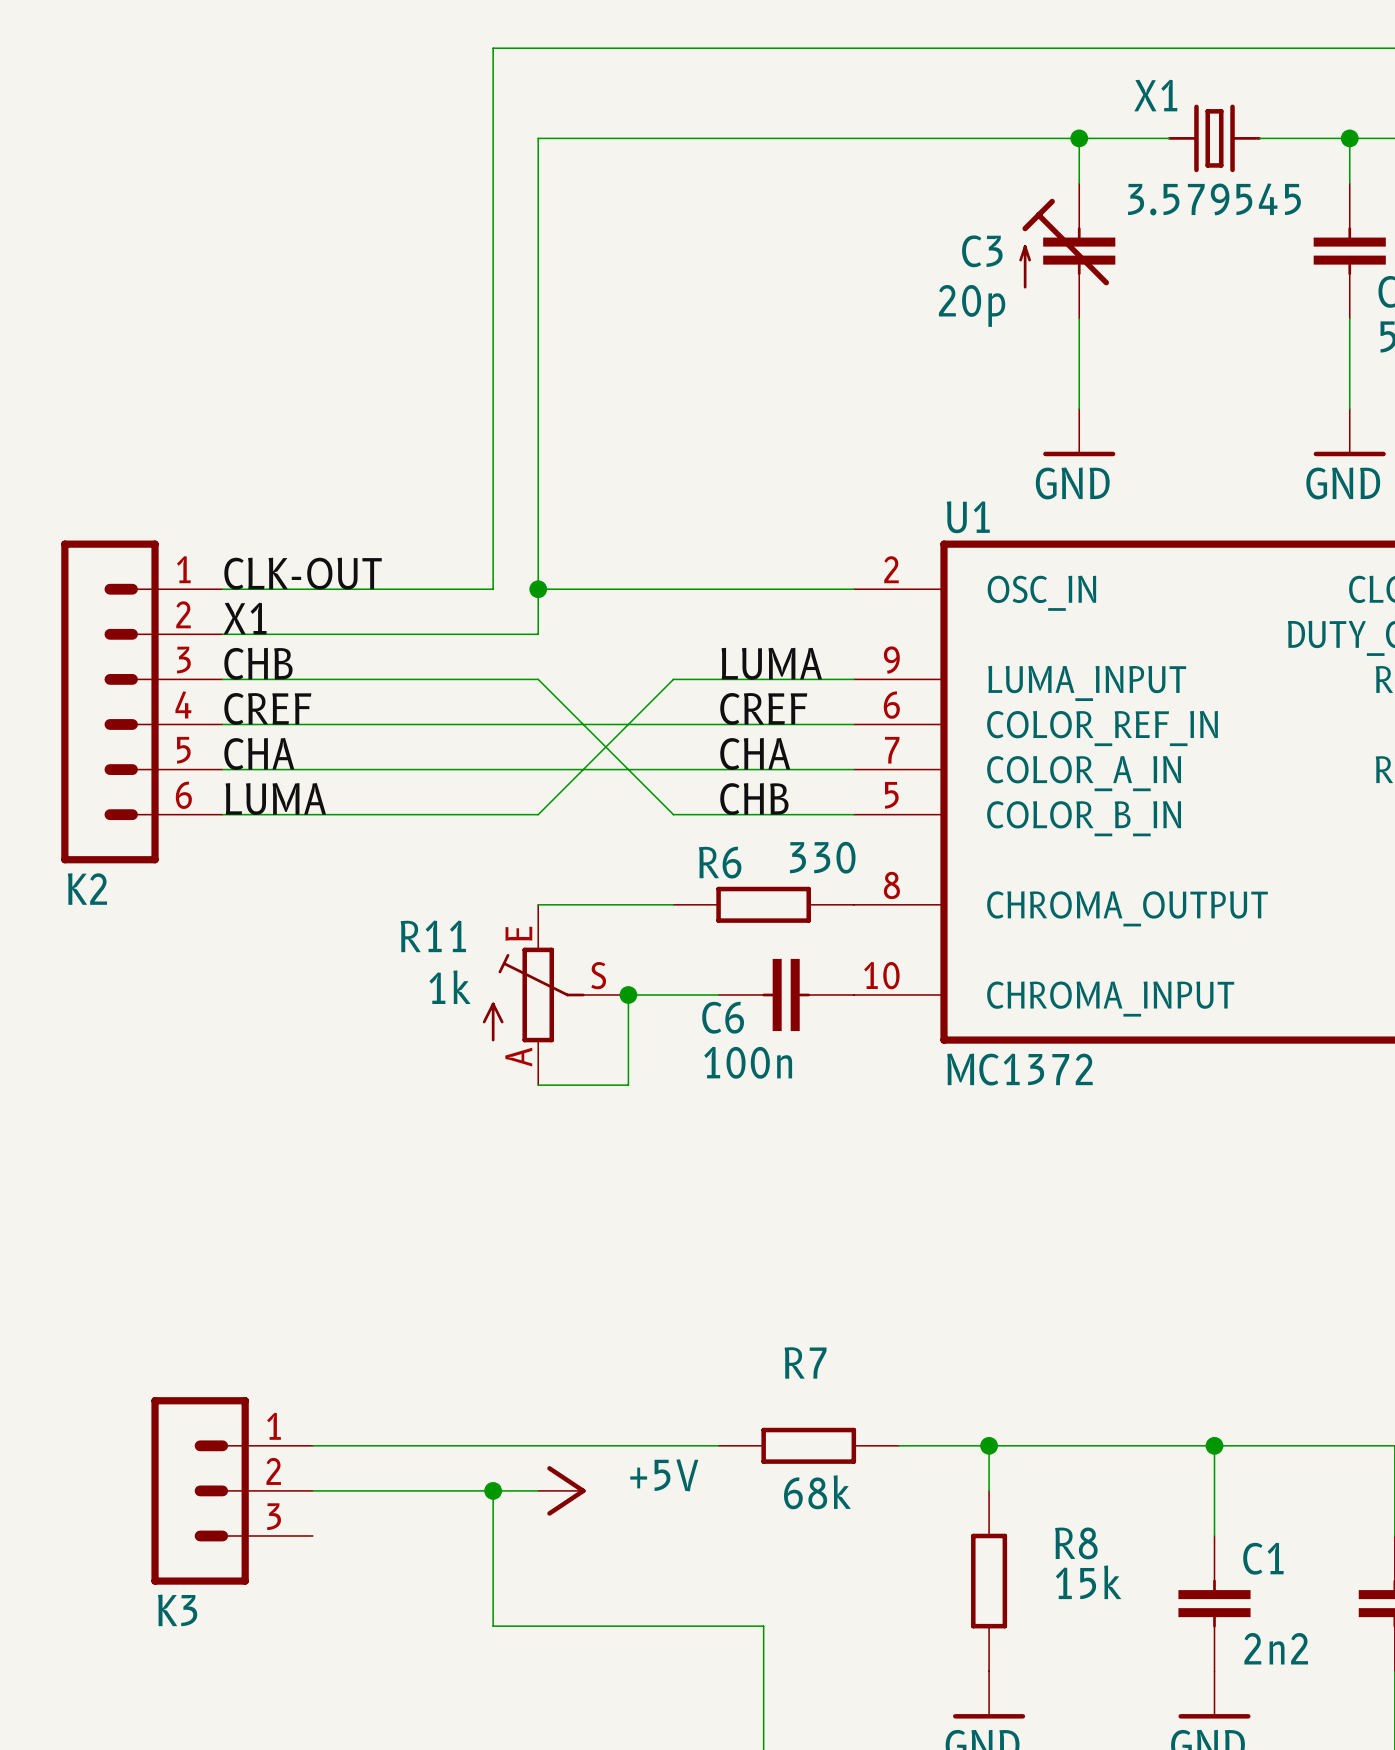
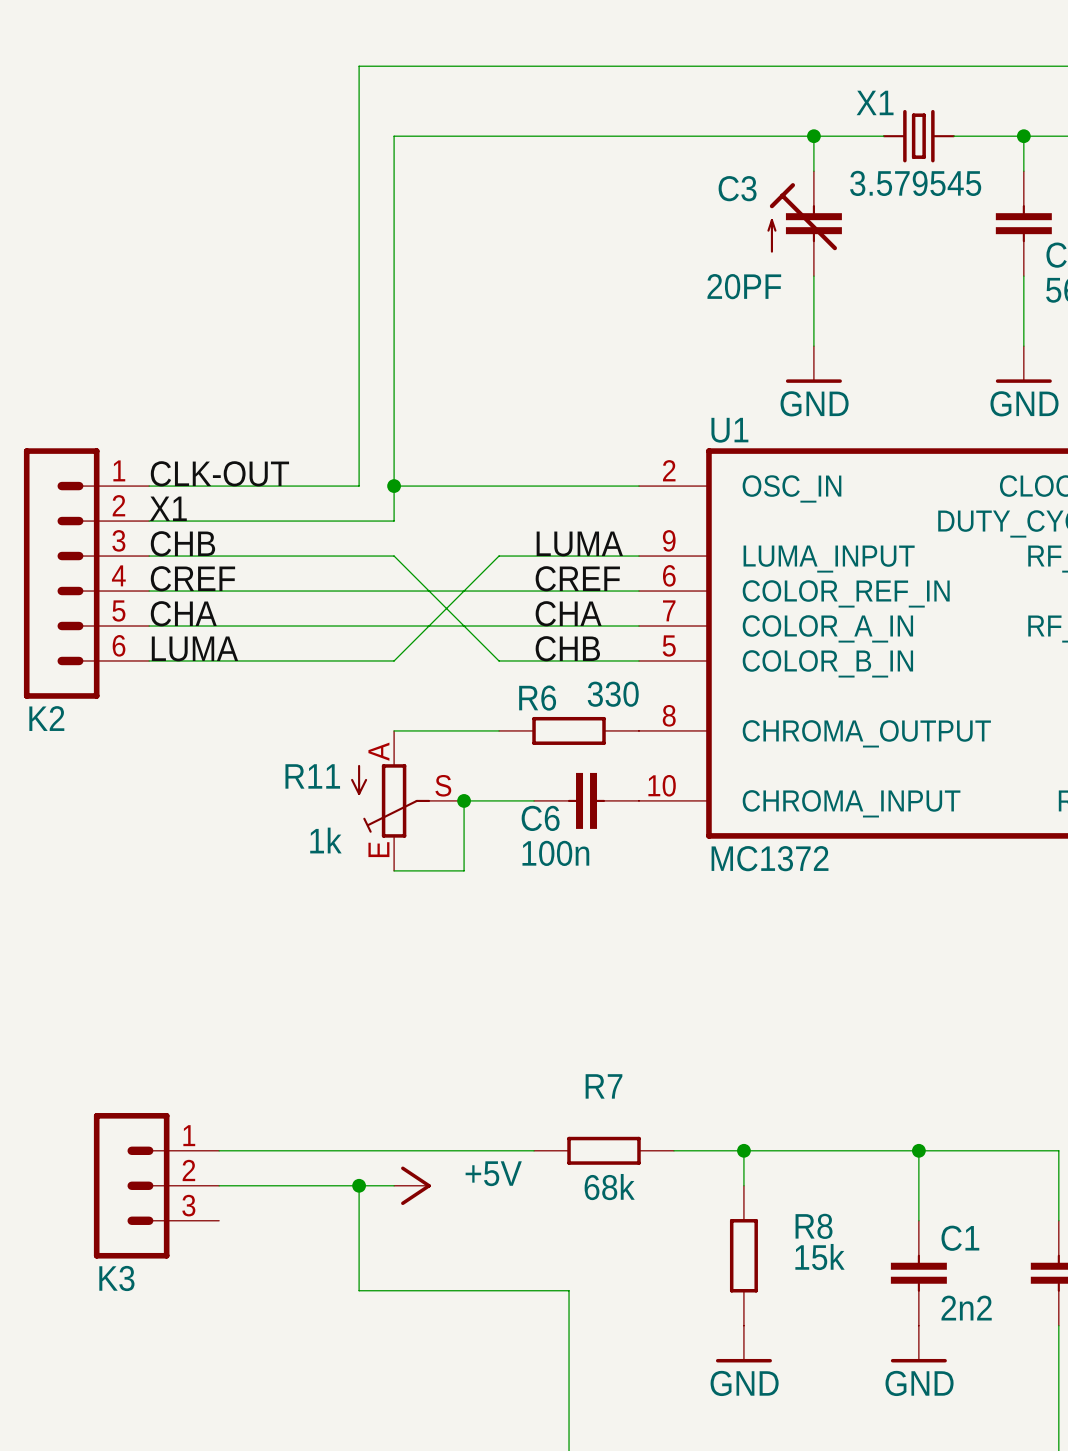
C3 name position: C3 (982, 251) -> C3 (737, 188)
C3 value: 20p (972, 305) -> 20PF (744, 286)
R11 value position: 1k (450, 987) -> 1k (325, 840)
R11 flip: as is (533, 994) -> up-down (390, 800)

